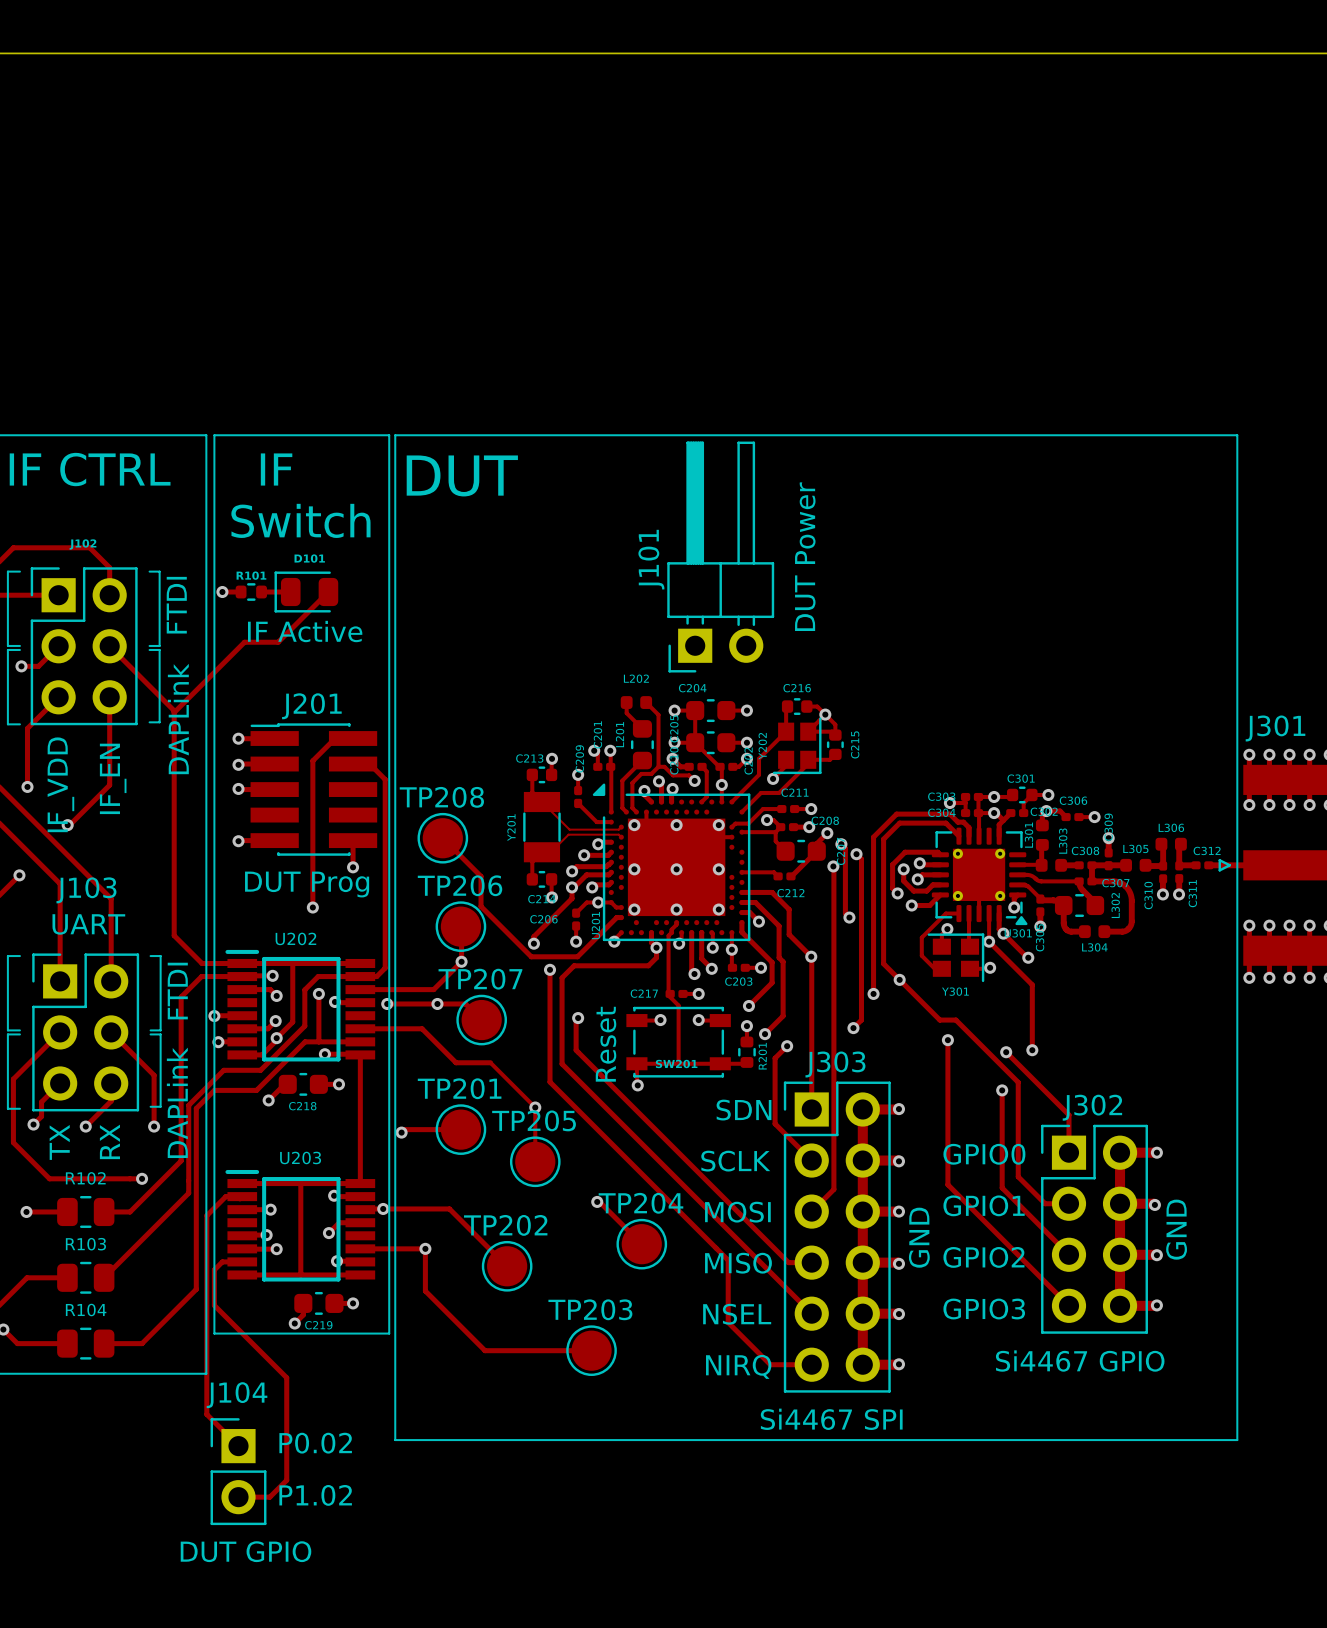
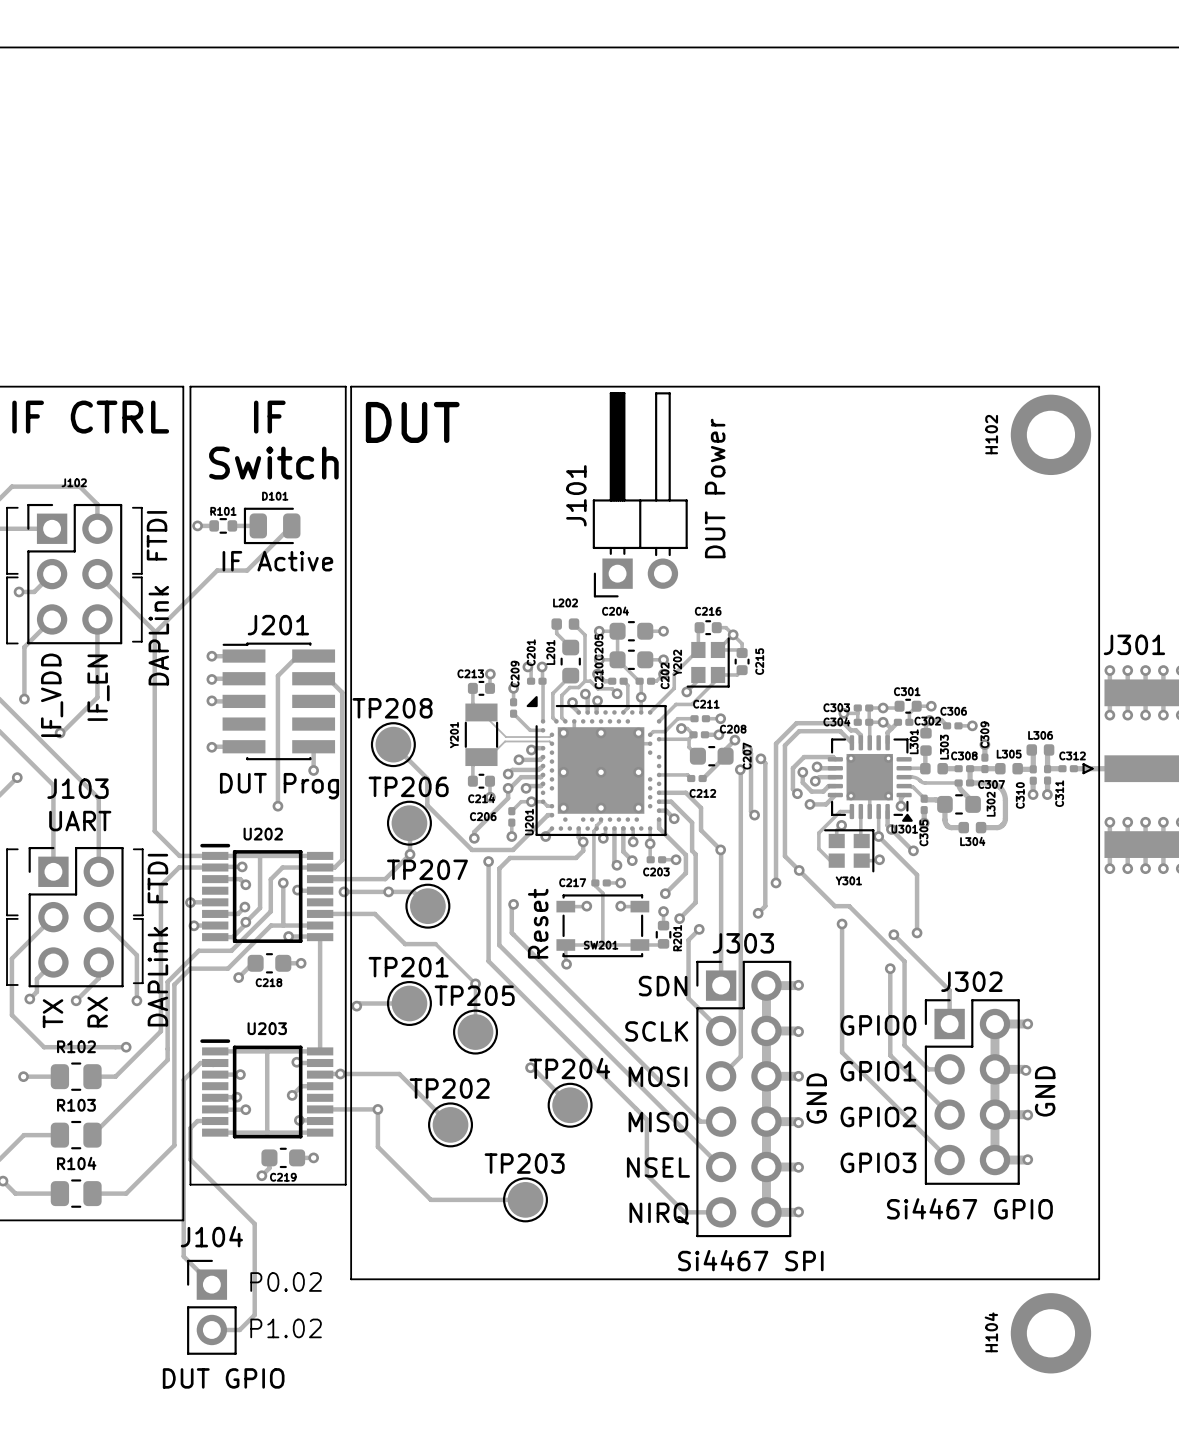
H102: none -> (1050, 434)
H104: none -> (1050, 1333)

